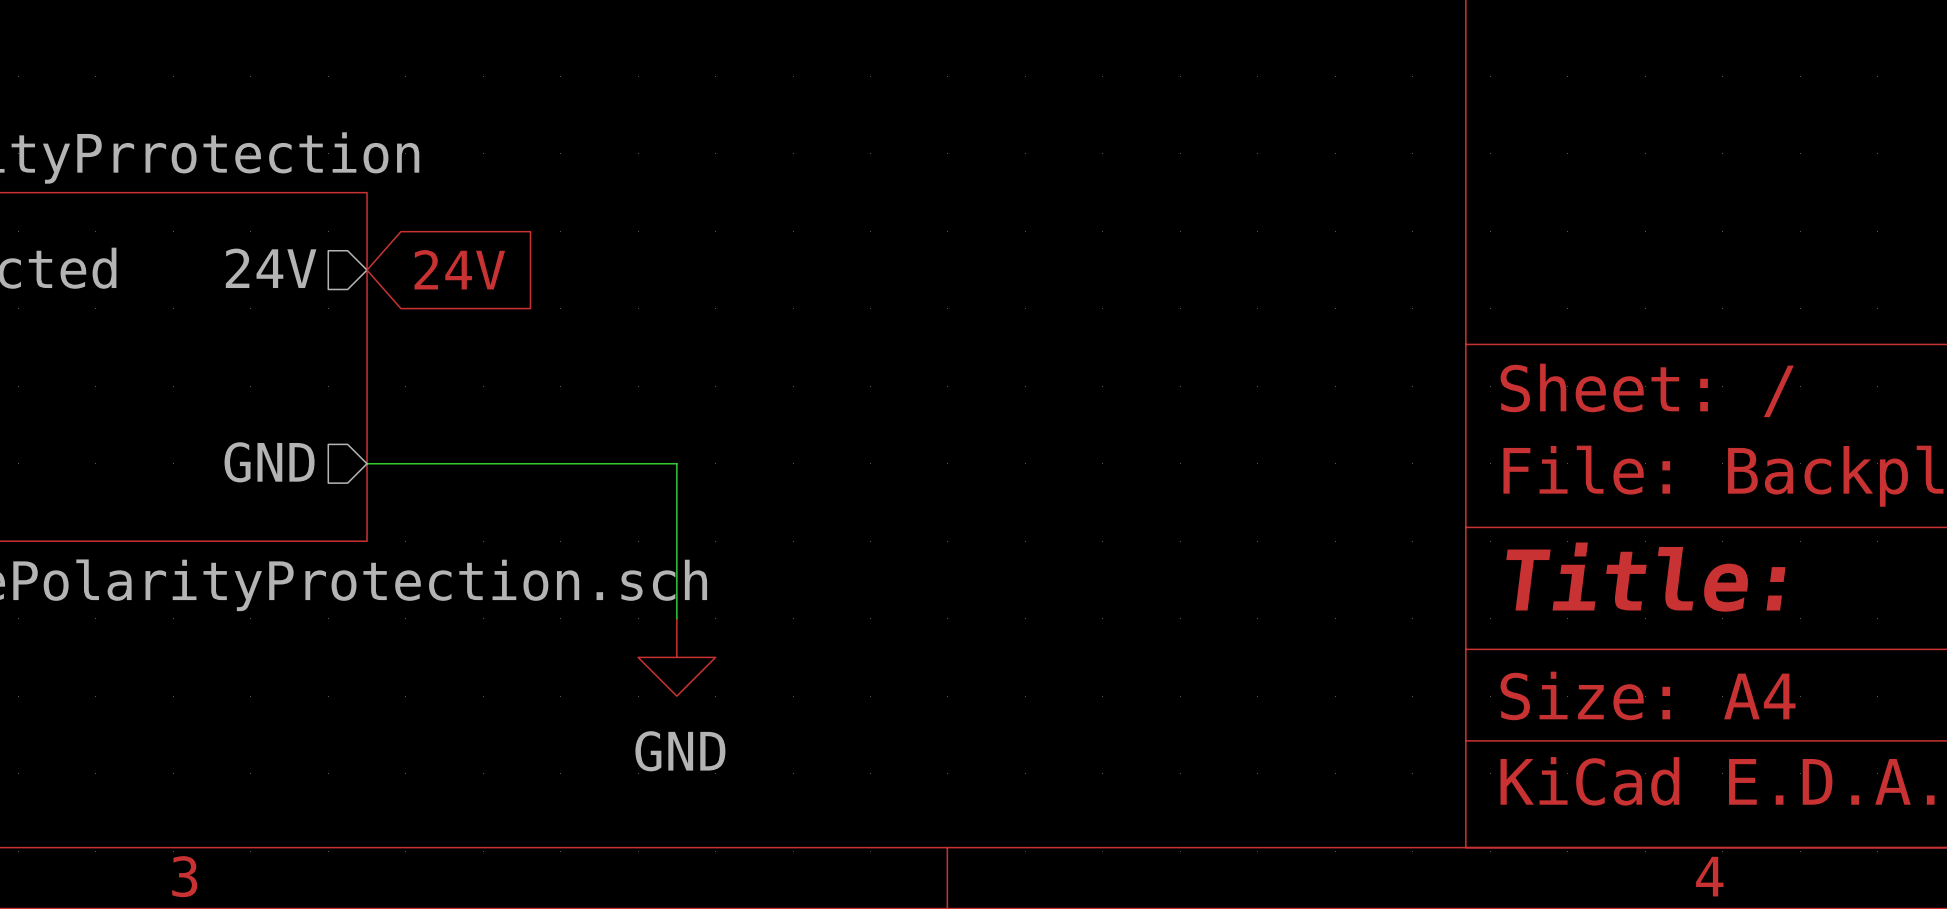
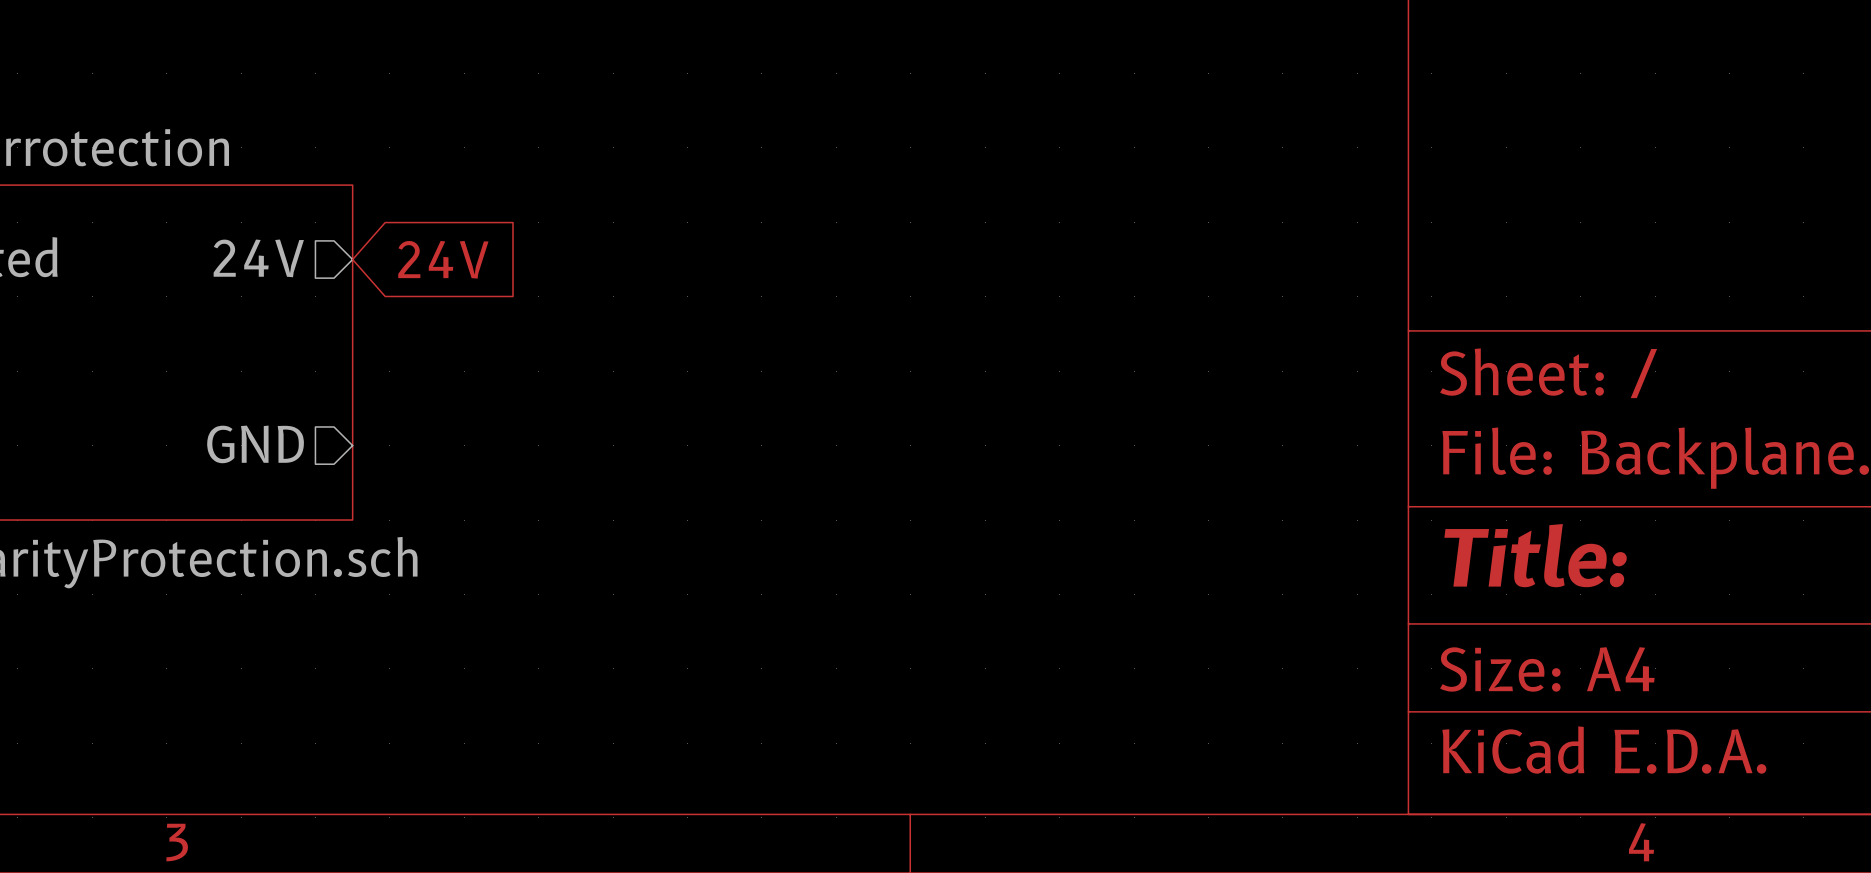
wire: (367, 463) (676, 463) (676, 618) -> none
power symbol: GND (676, 657) -> none

